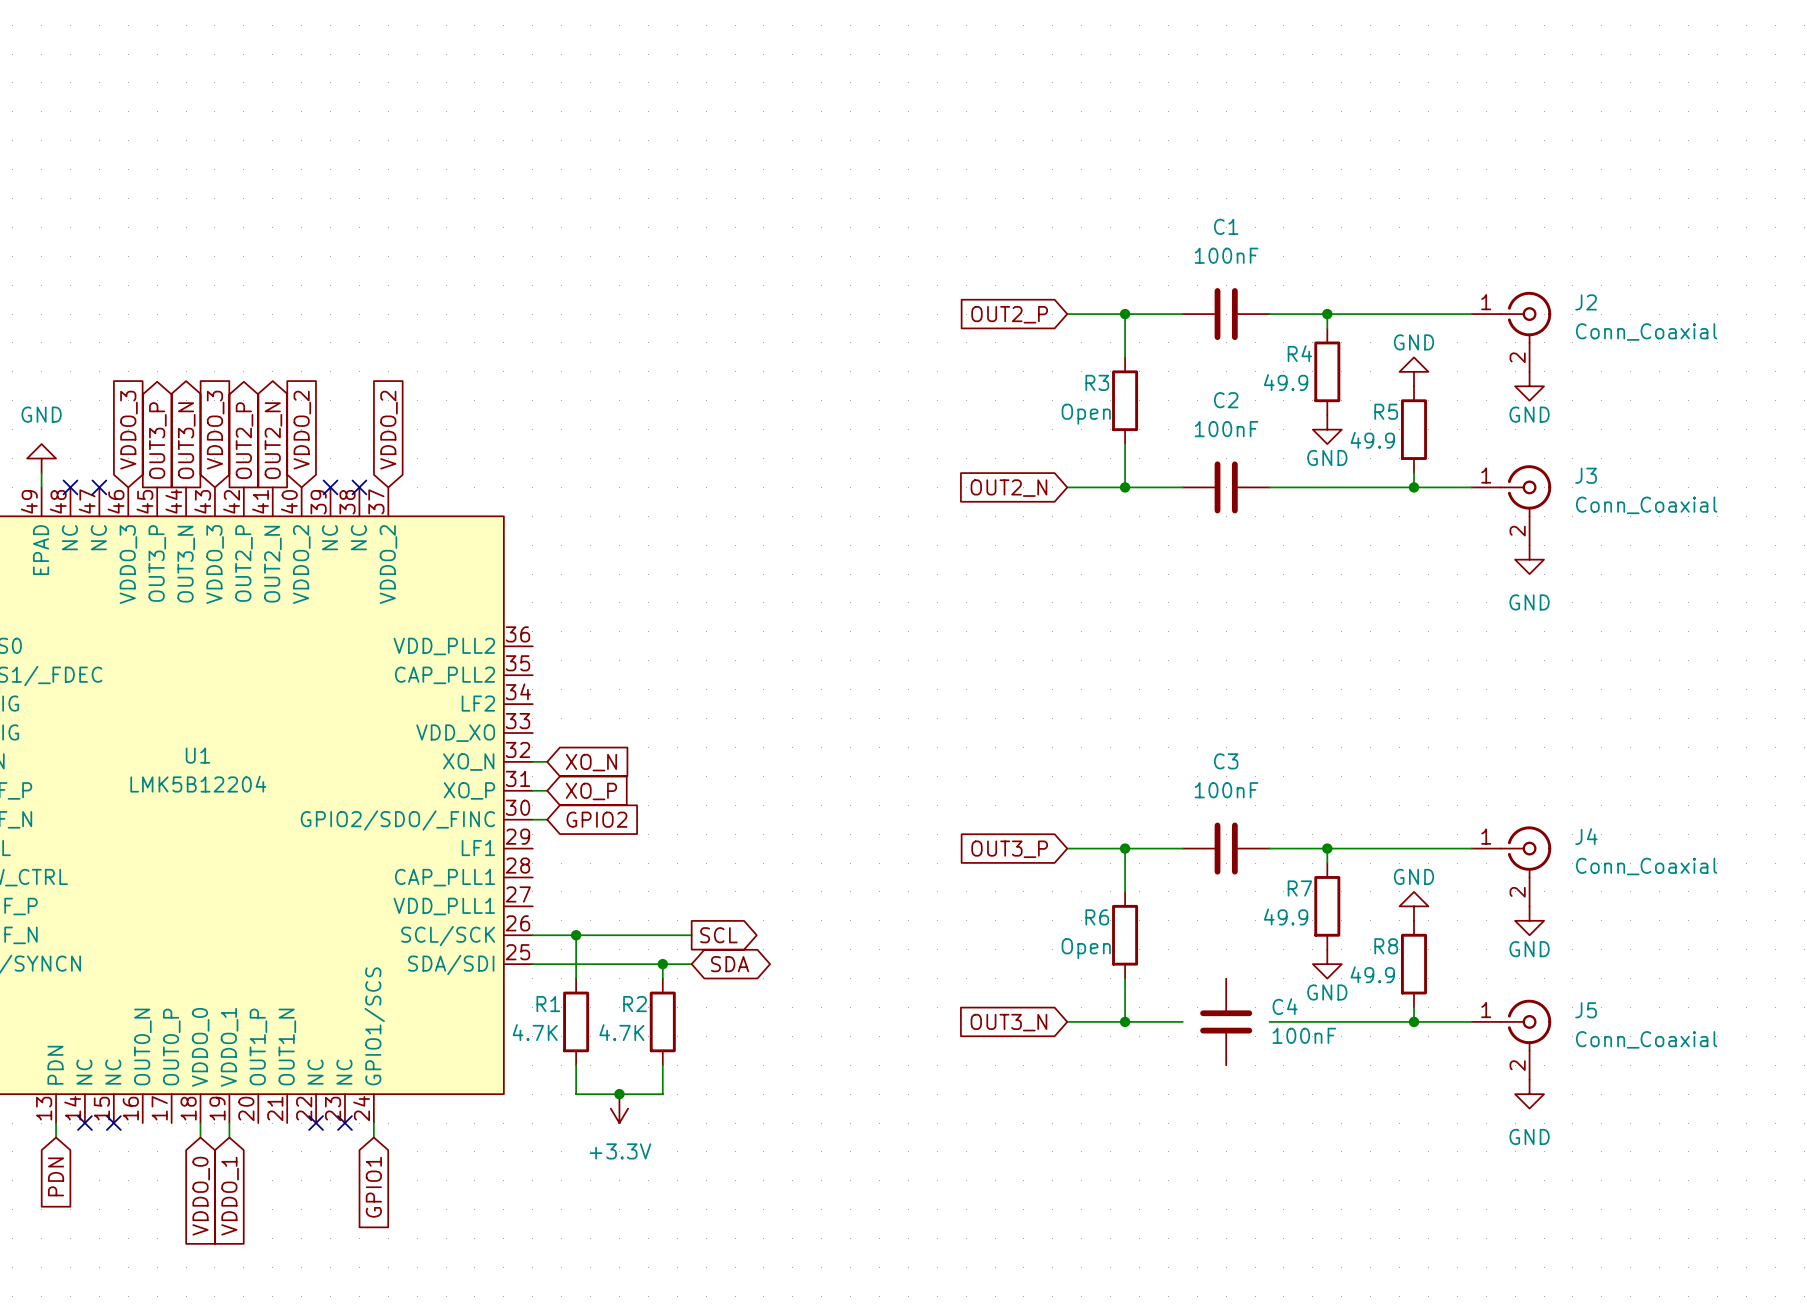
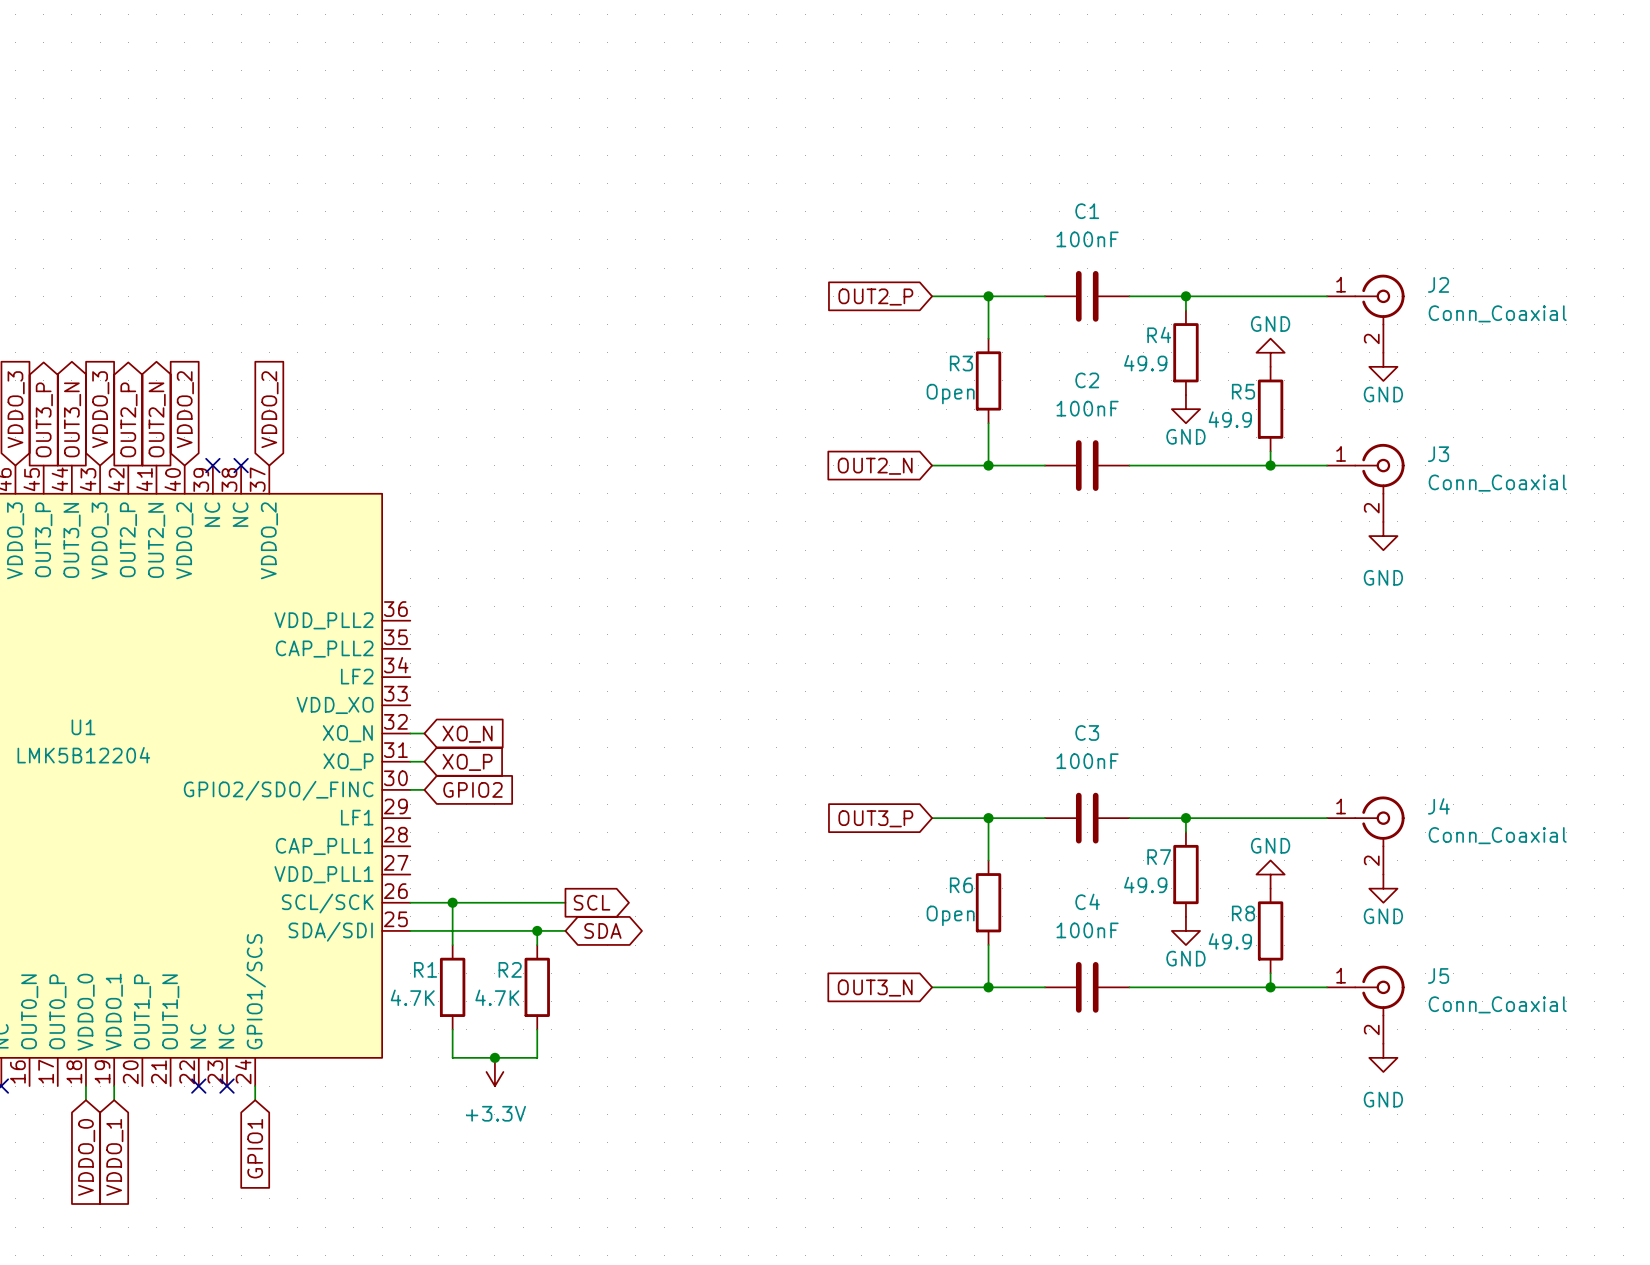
C4 name position: C4 (1285, 1006) -> C4 (1087, 901)
C4 rotation: 0° (1226, 1021) -> 90° clockwise (1087, 987)
C4 value position: 100nF (1304, 1035) -> 100nF (1087, 930)

